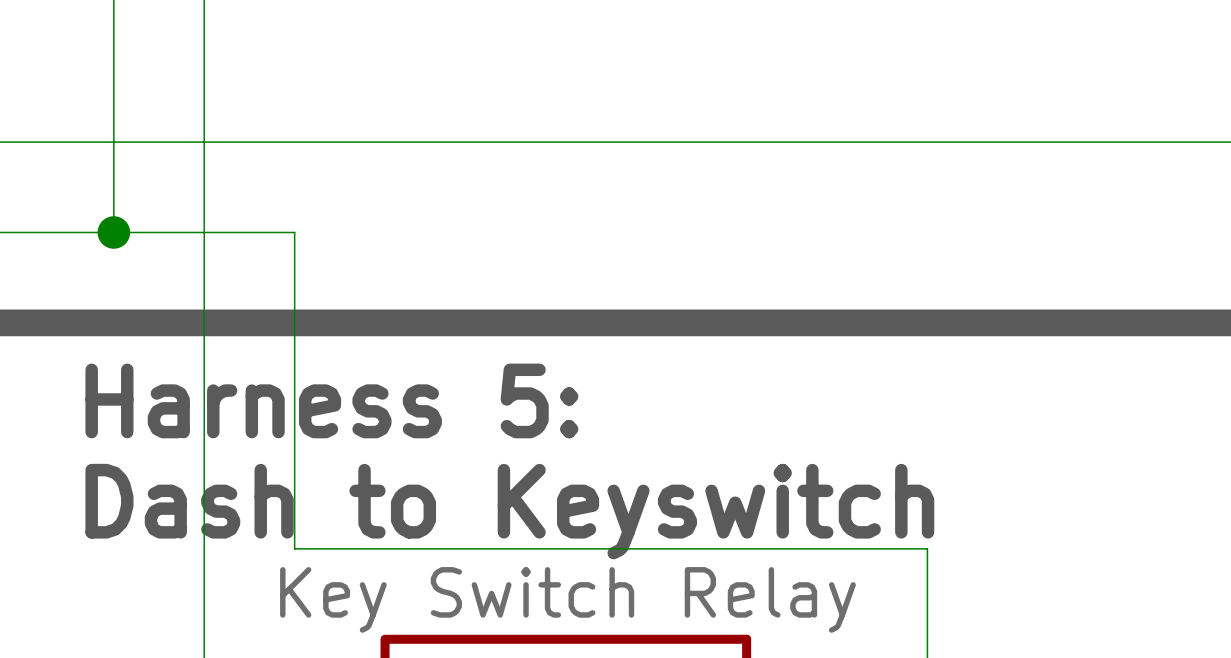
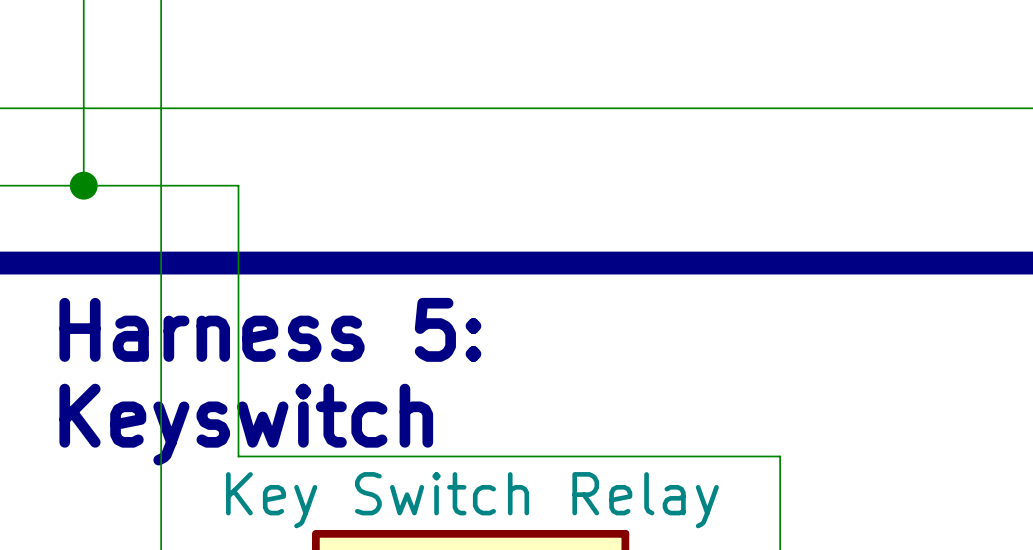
text: Dash to Keyswitch (509, 511) -> Keyswitch (246, 424)

